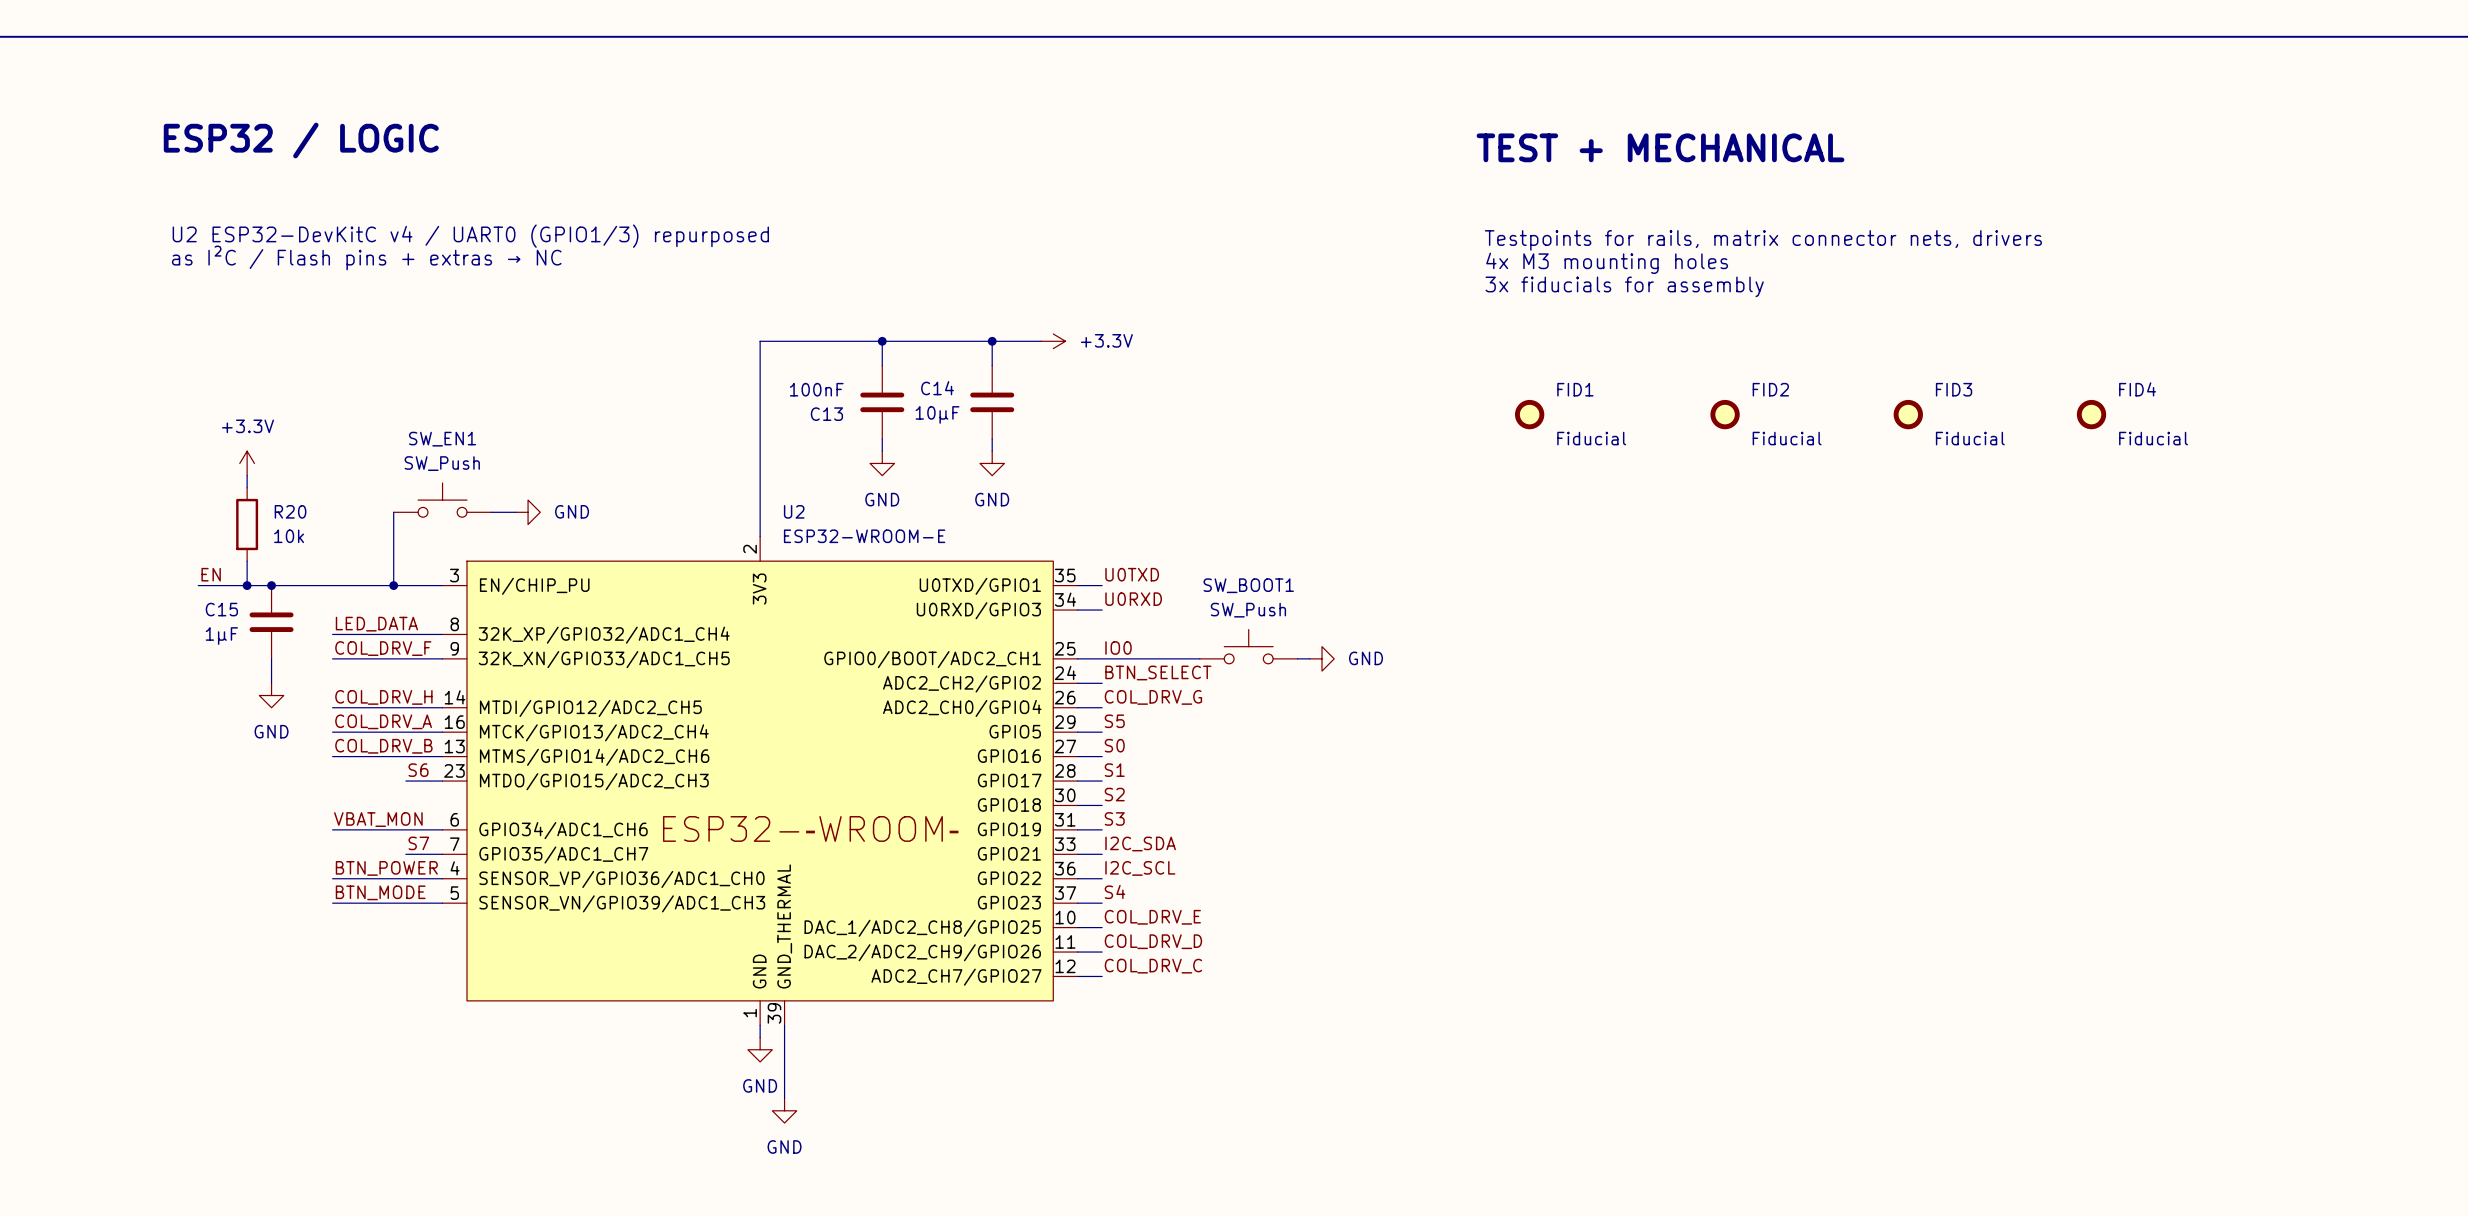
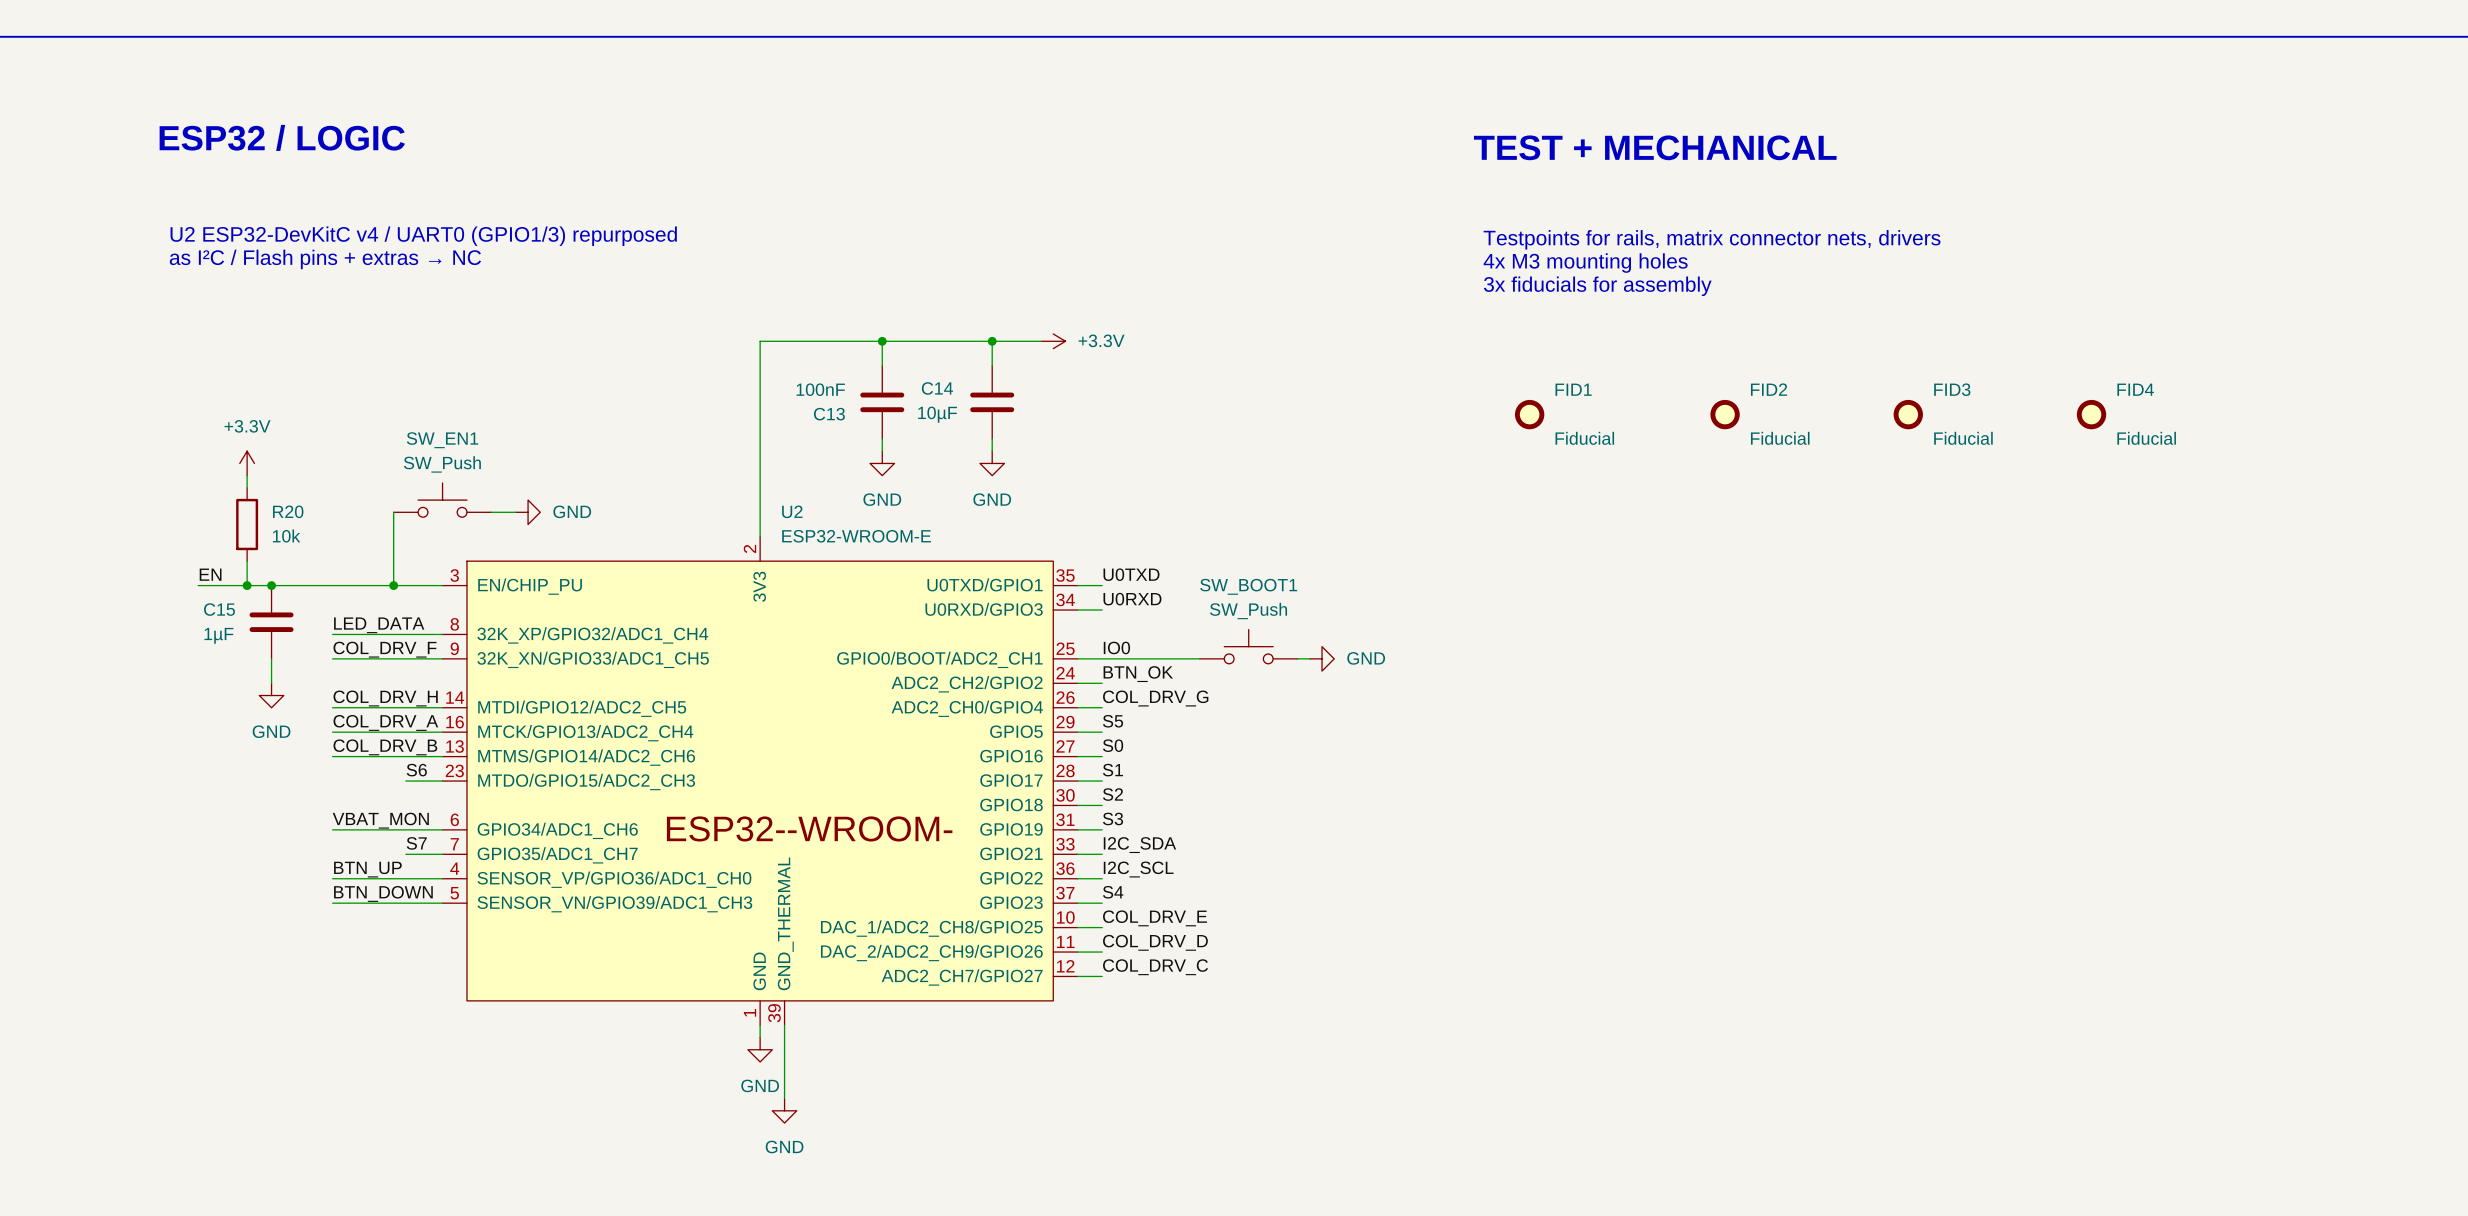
label: BTN_SELECT (1158, 672) -> BTN_OK (1138, 674)
label: BTN_POWER (386, 868) -> BTN_UP (367, 869)
label: BTN_MODE (380, 892) -> BTN_DOWN (383, 893)

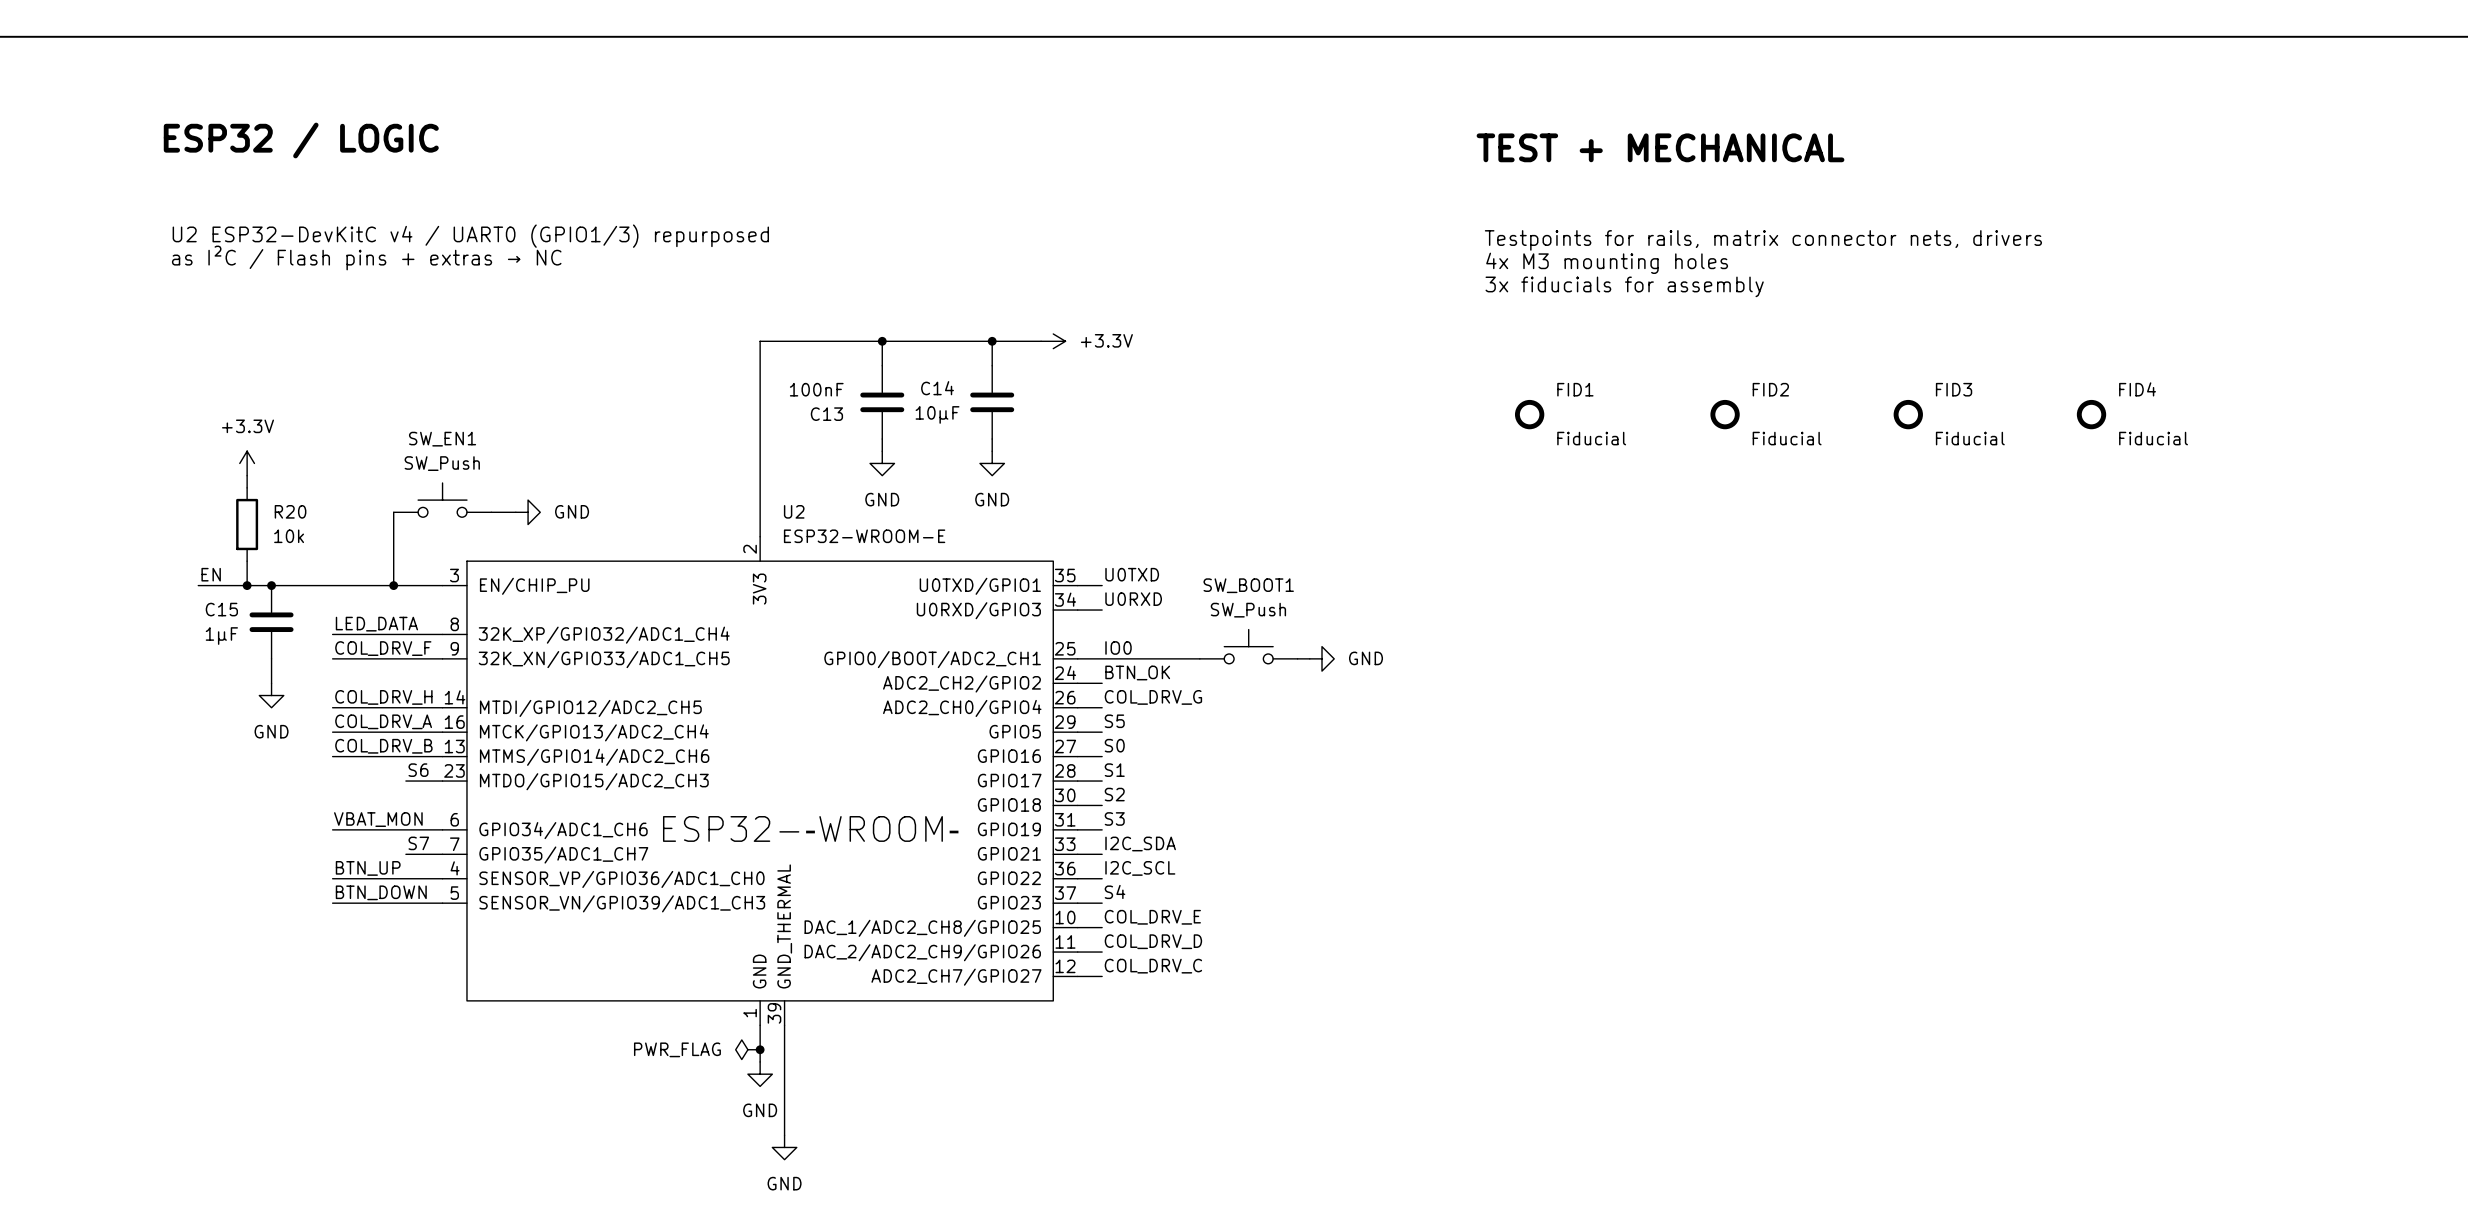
power symbol: none -> PWR_FLAG (747, 1049)
power symbol: GND (760, 1049) -> none
junction: none -> (760, 1049)
power symbol: none -> GND (760, 1074)
wire: none -> (784, 1098) (784, 1135)
power symbol: GND (784, 1110) -> none
power symbol: none -> GND (784, 1147)

